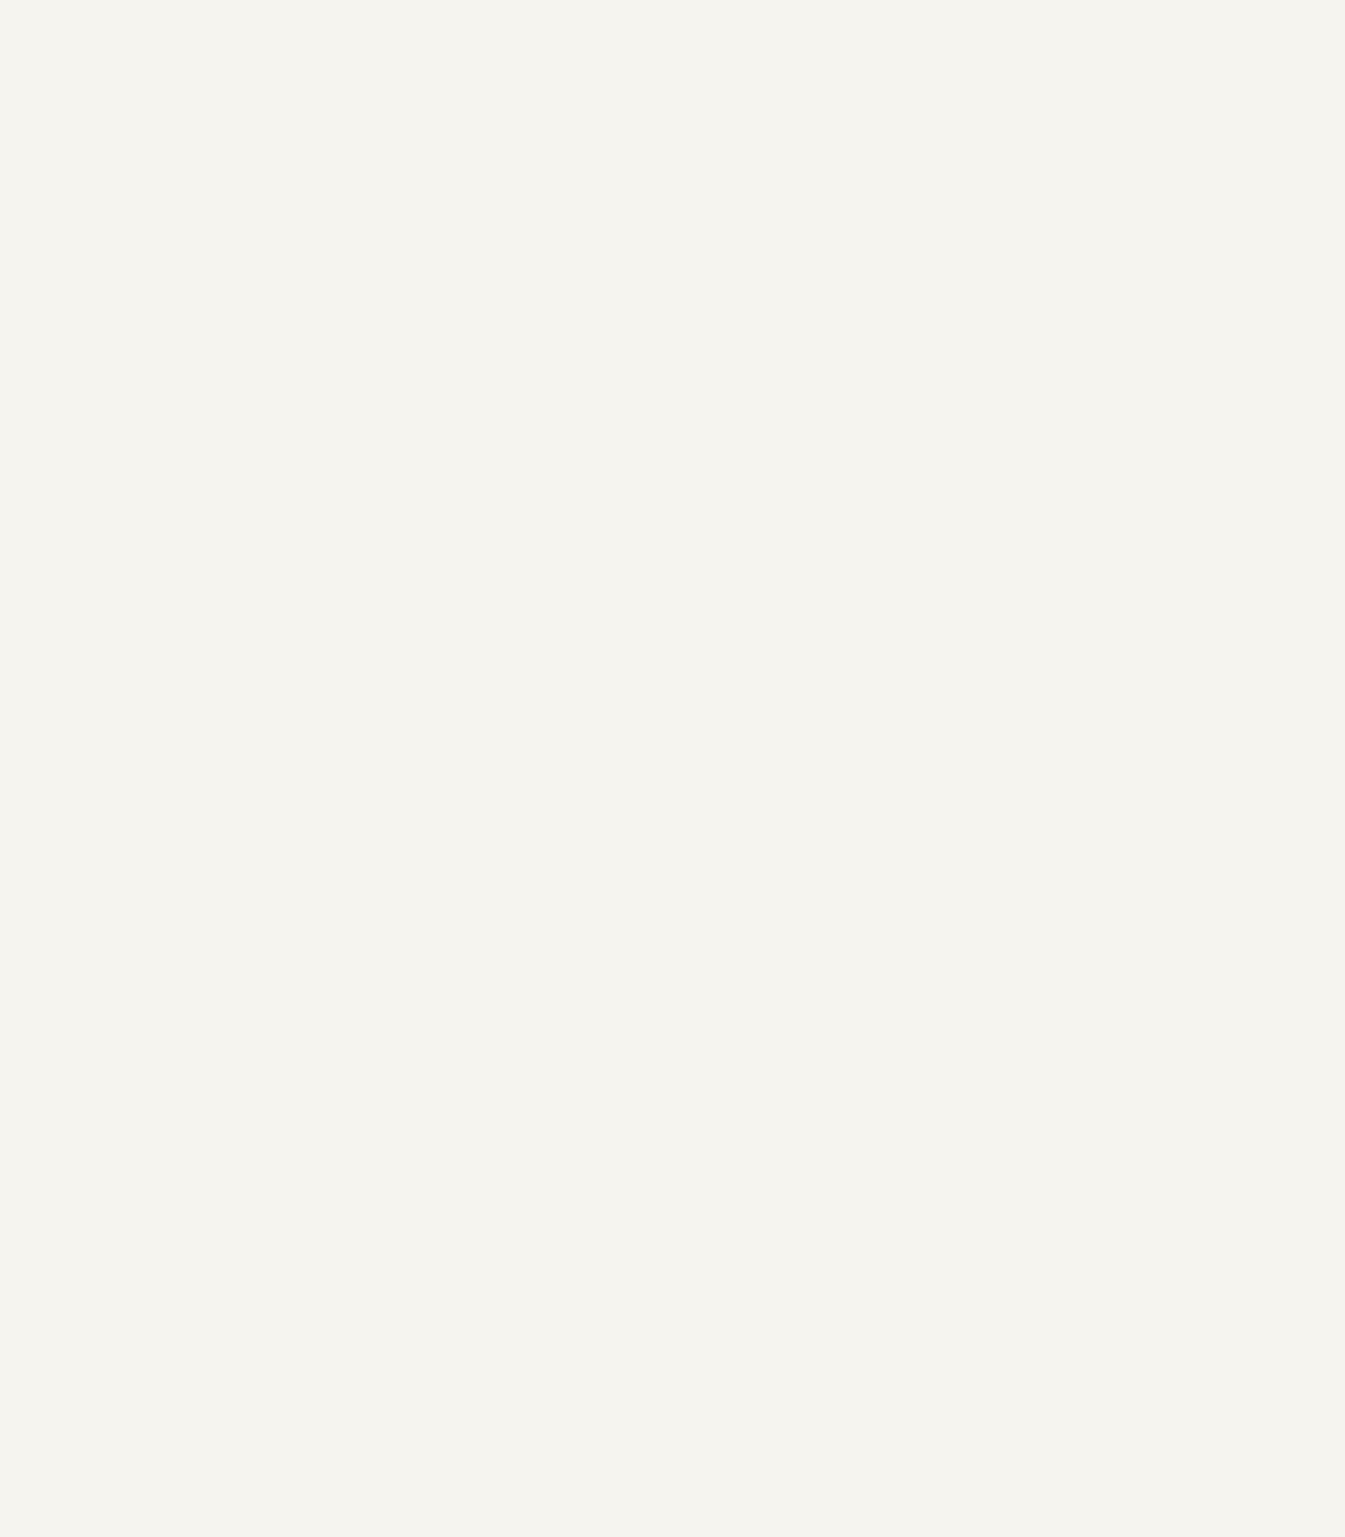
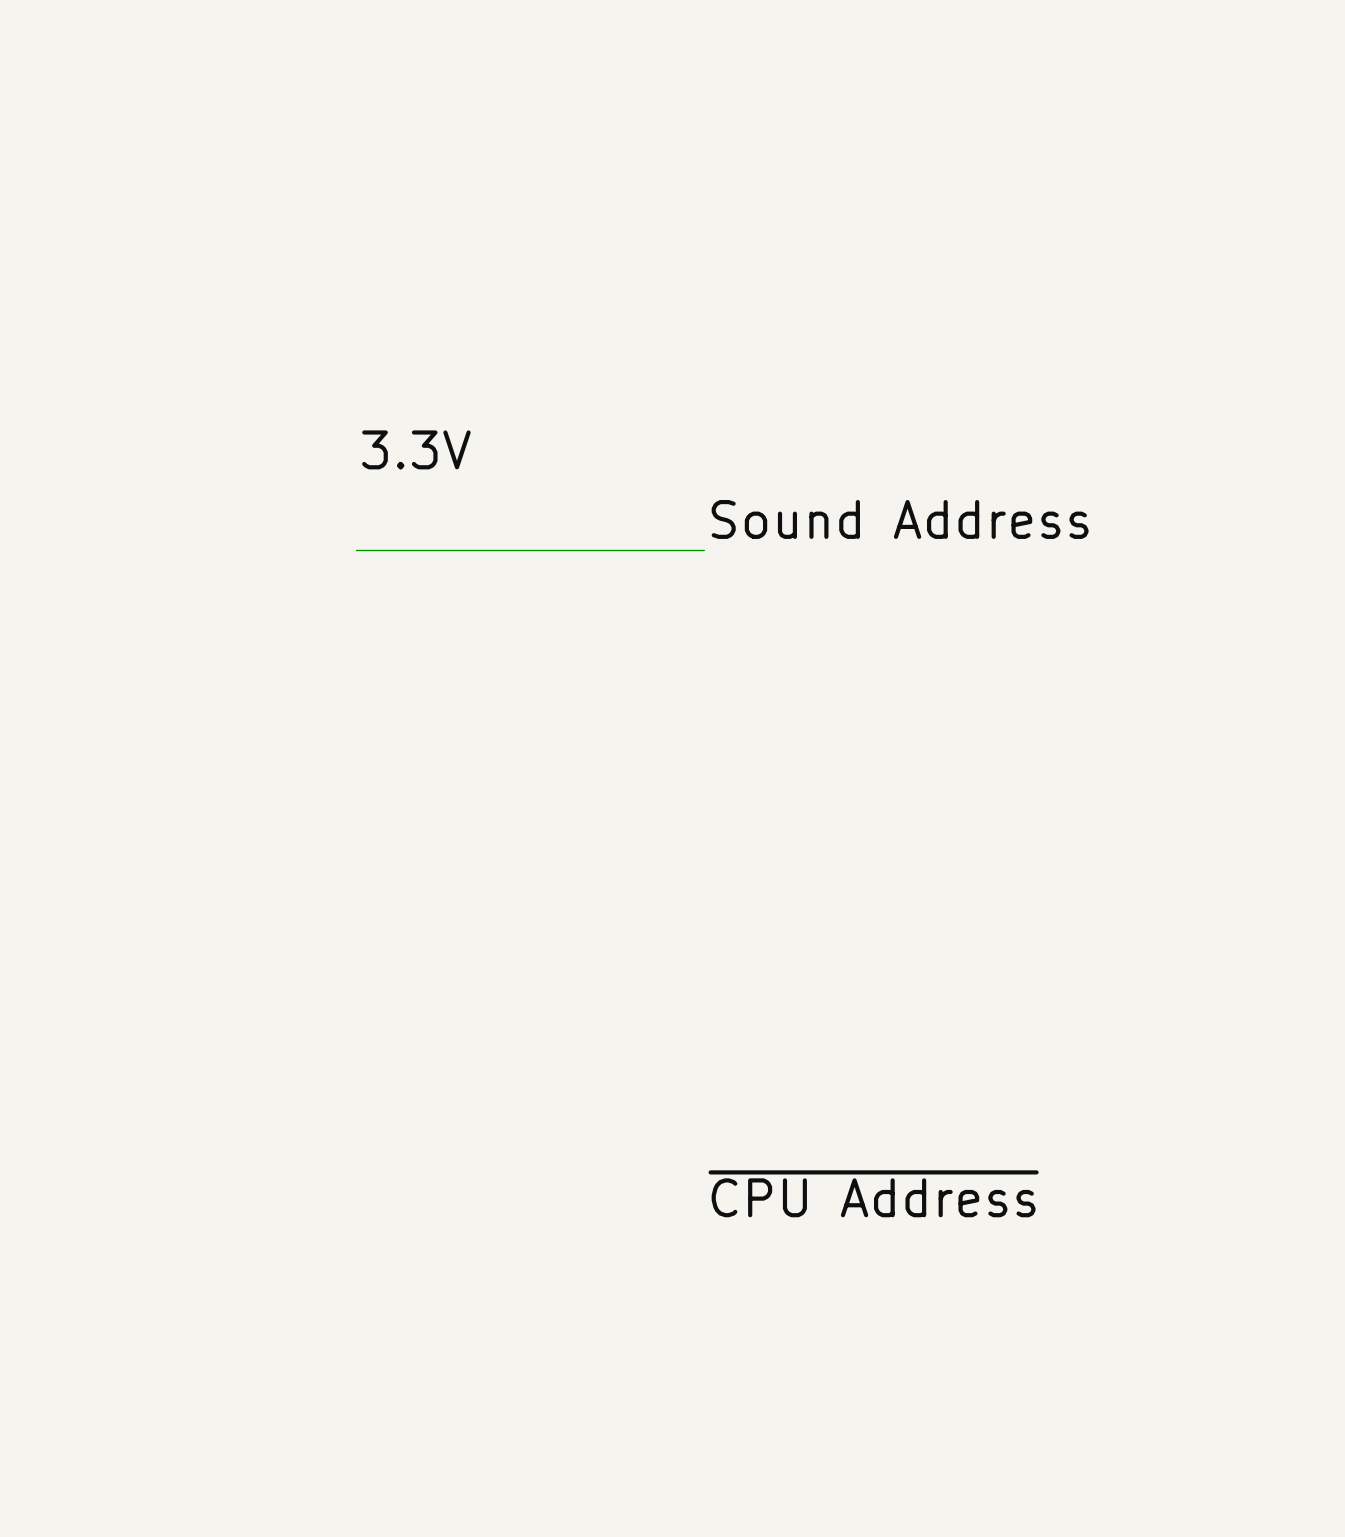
label: none -> 3.3V (416, 449)
label: none -> Sound Address (900, 519)
wire: none -> (356, 550) (704, 550)
label: none -> ~{CPU Address} (873, 1193)

